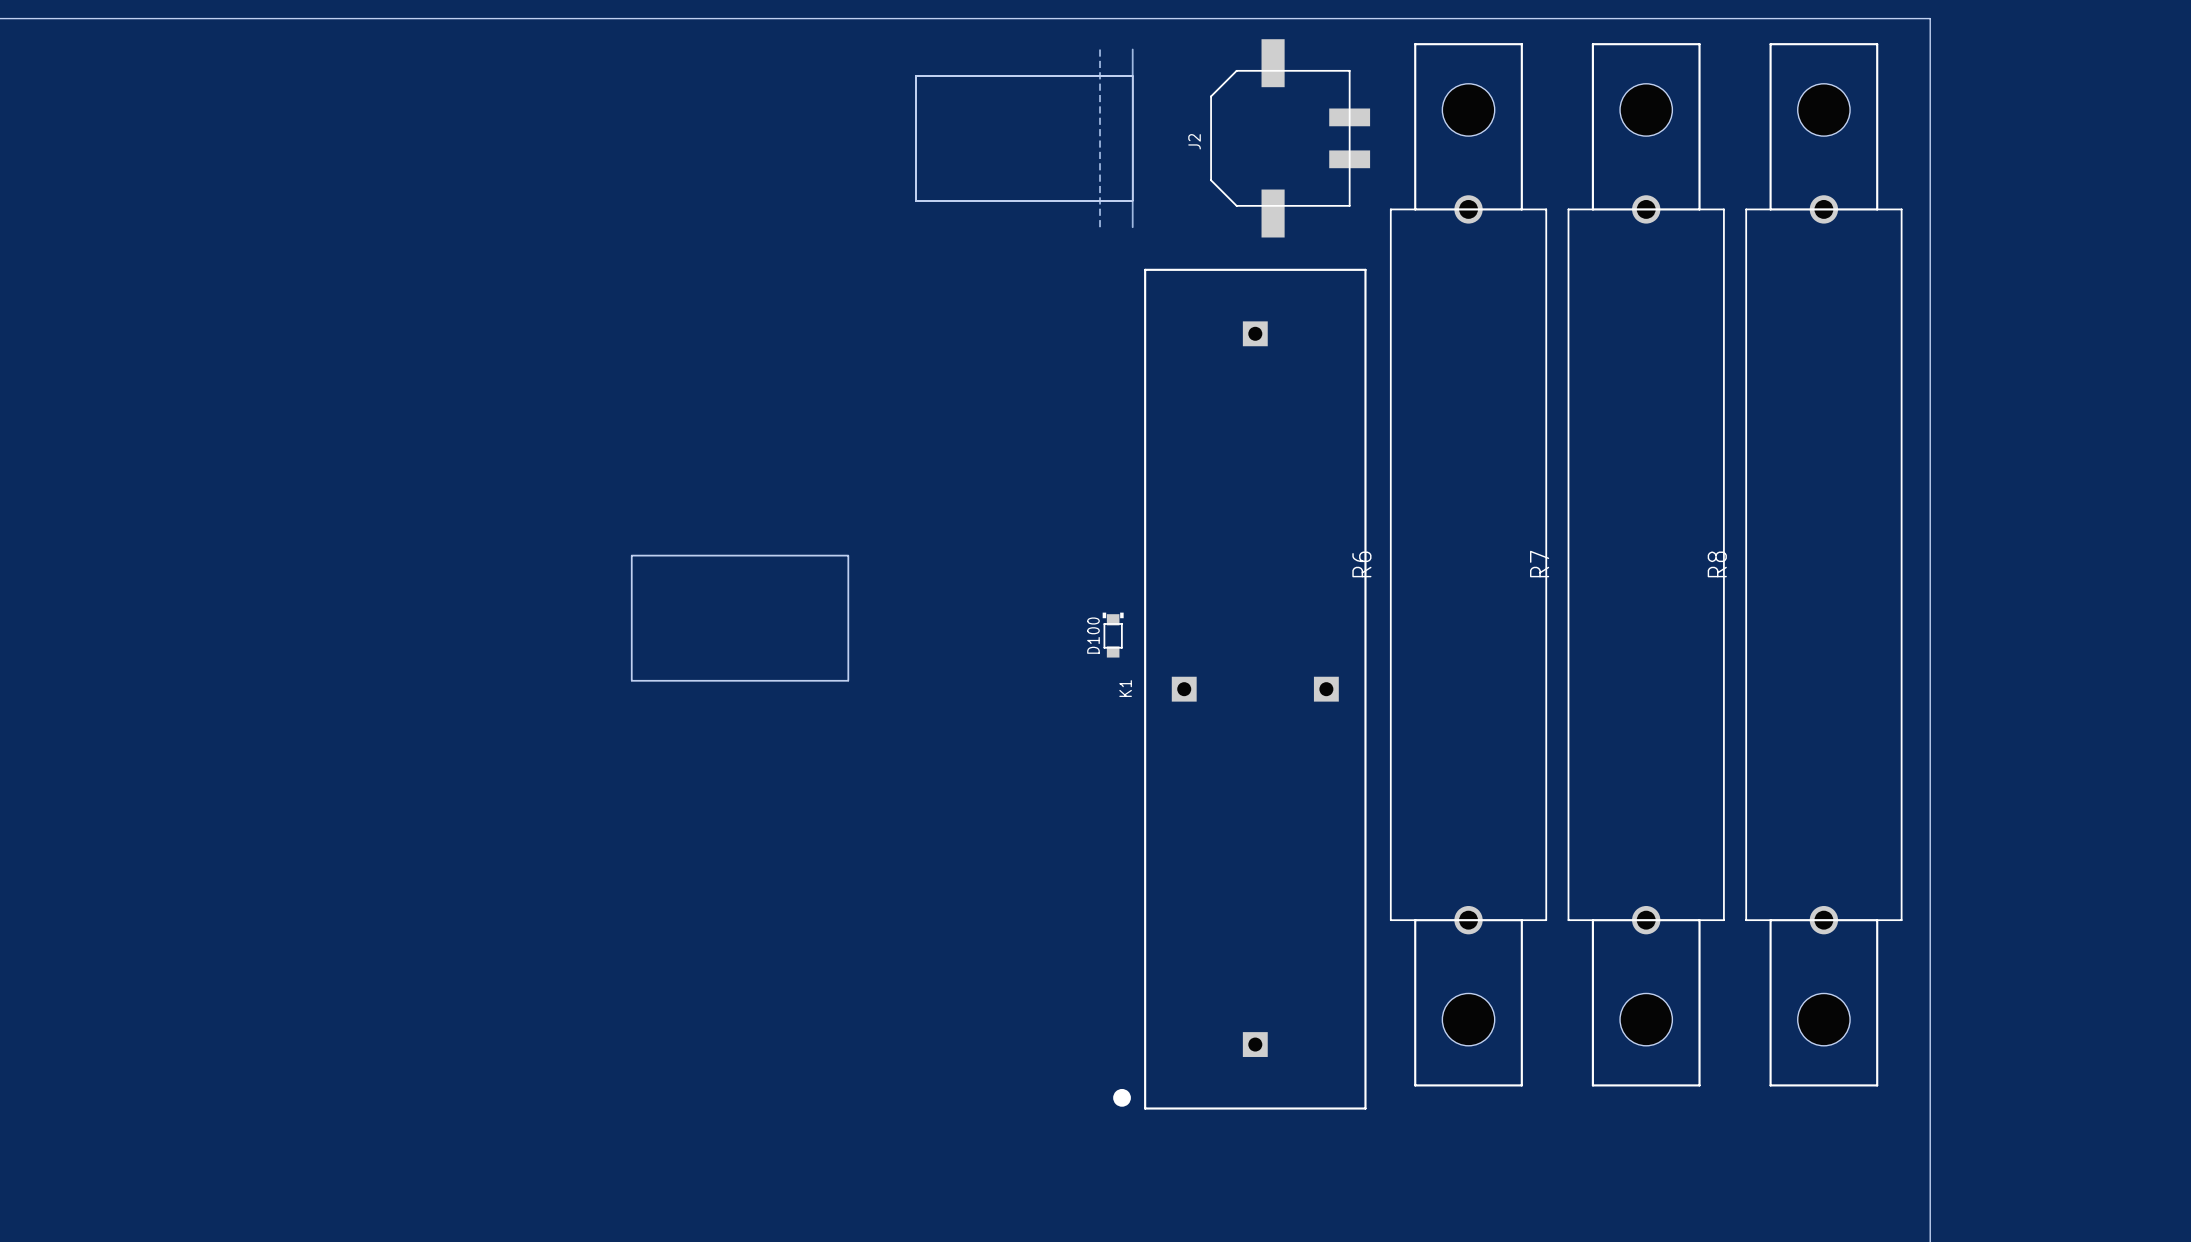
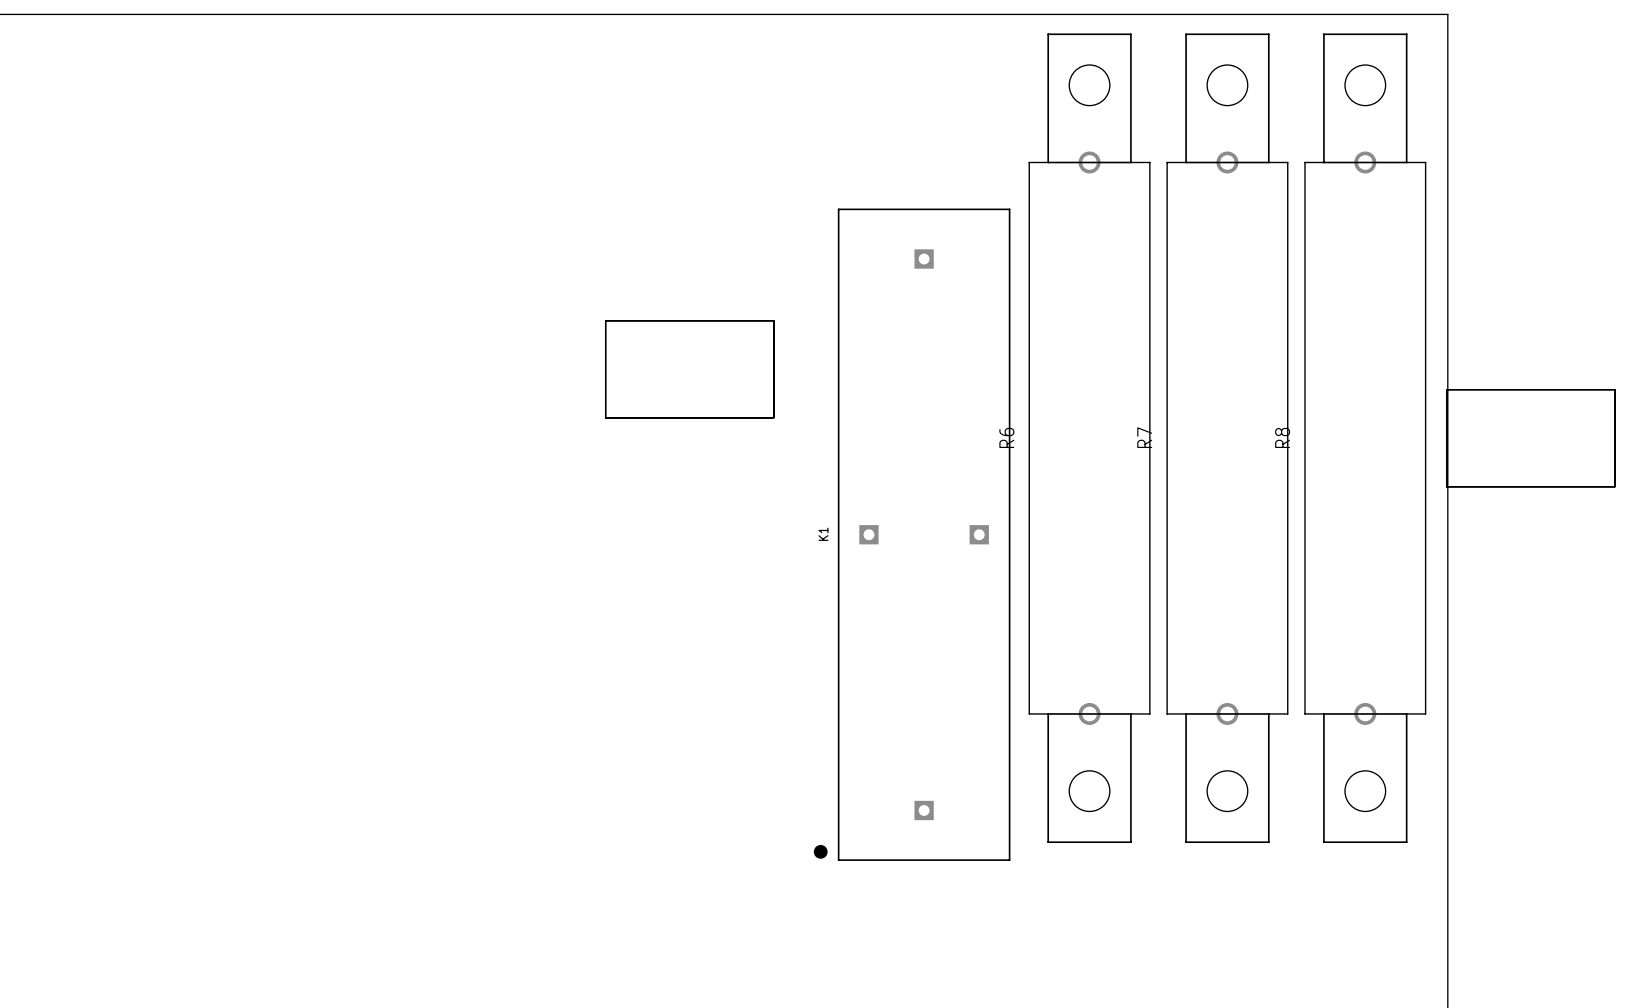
J2: (1143, 138) -> none
part: none -> (1530, 438)
part position: (740, 618) -> (689, 369)
D100: (1113, 635) -> none

